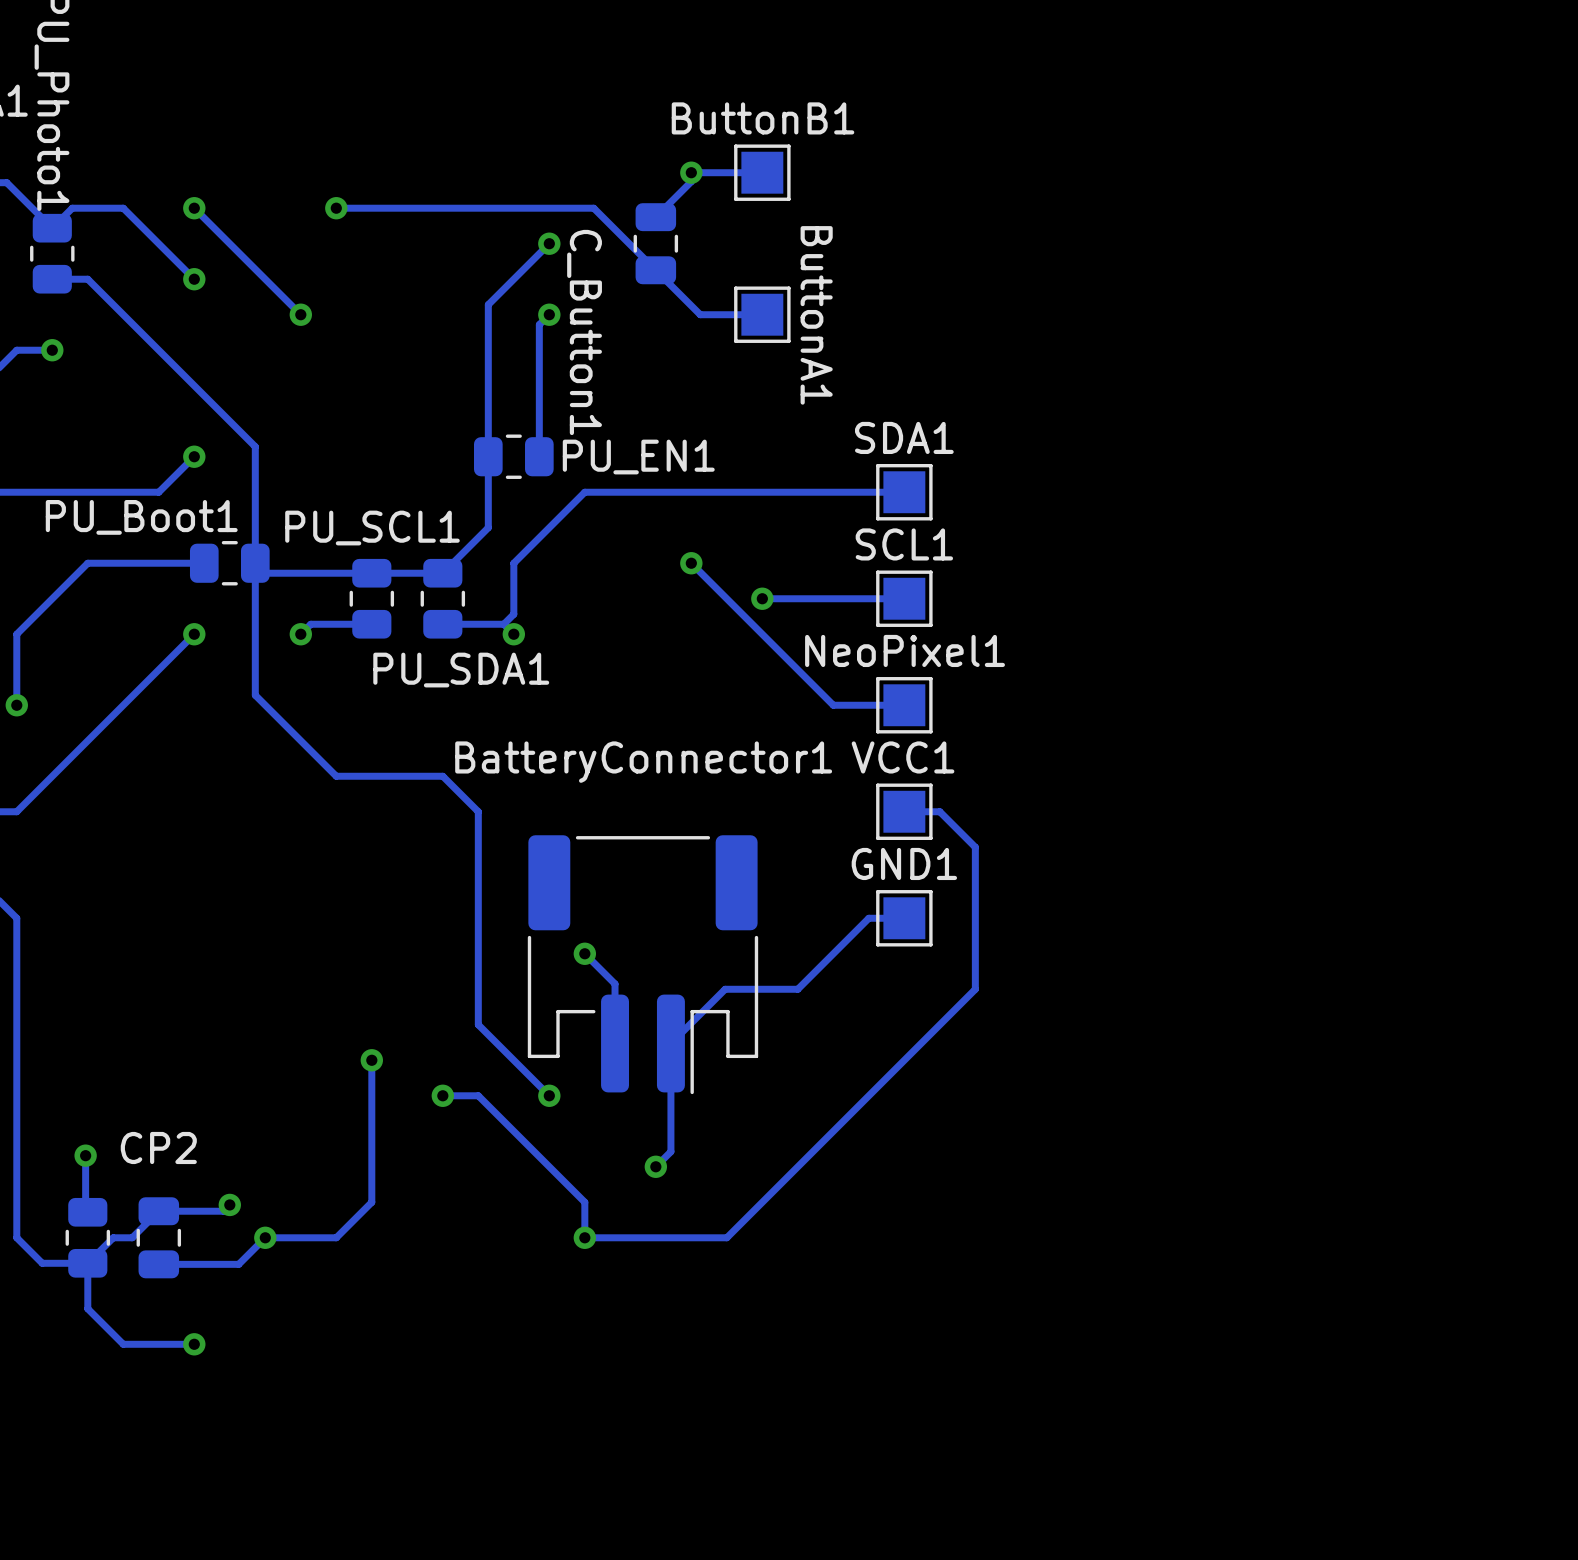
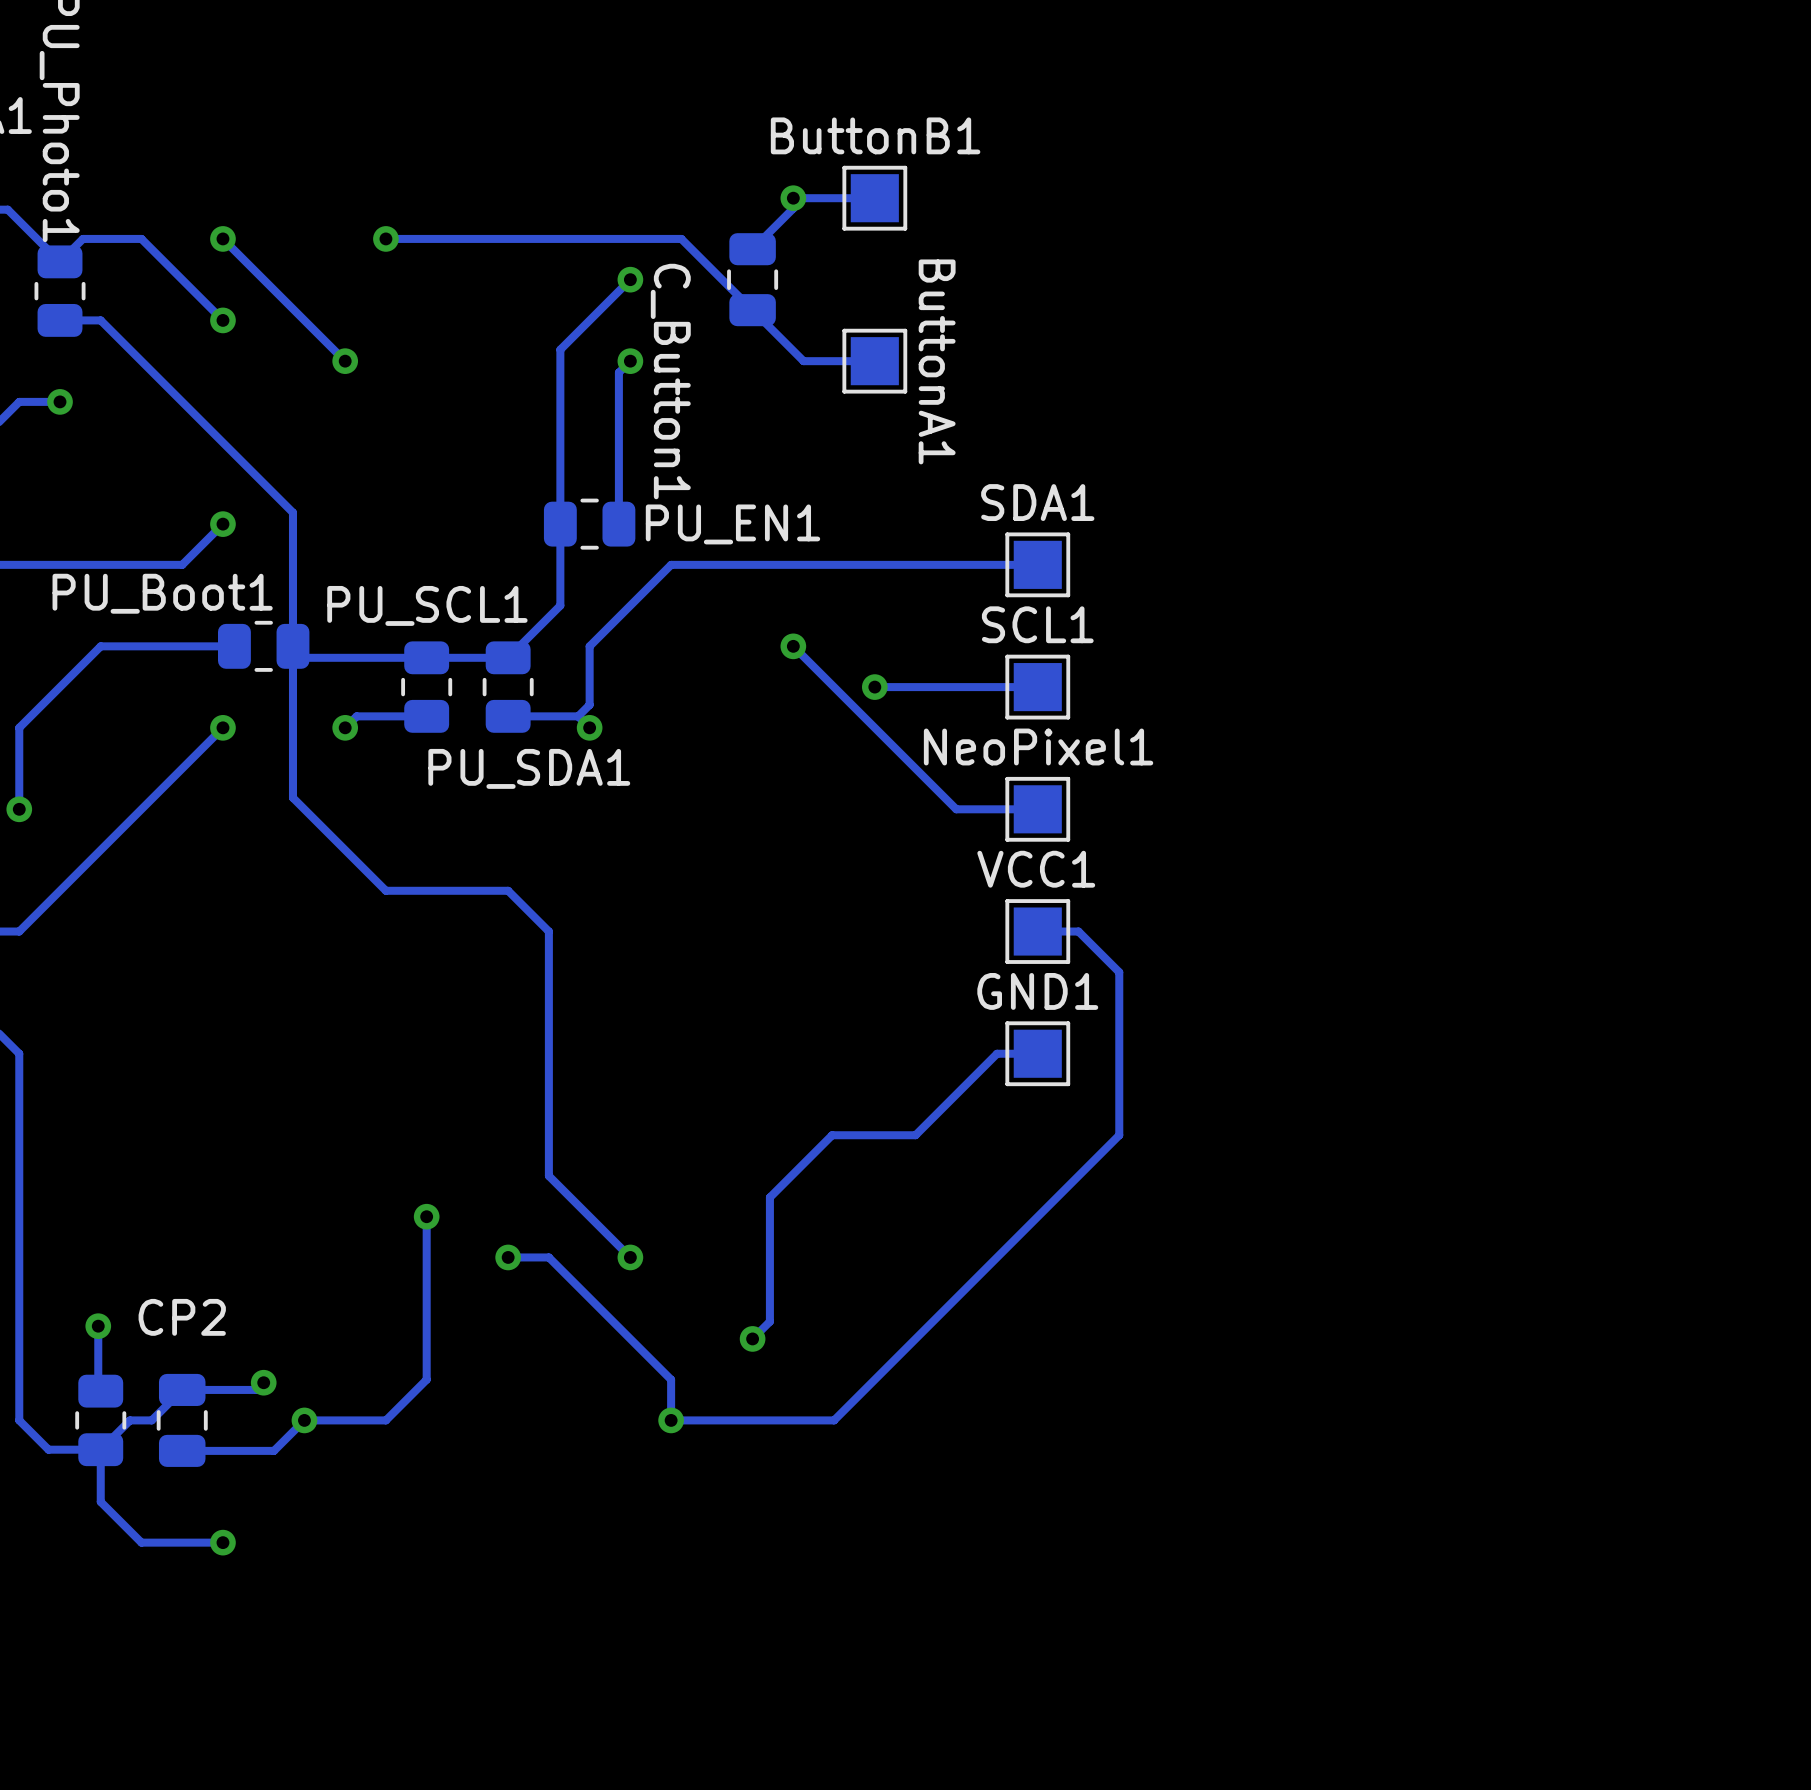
track: (584, 953) (615, 983) (615, 1043) -> none
via: (584, 953) -> none
BatteryConnector1: (642, 964) -> none

